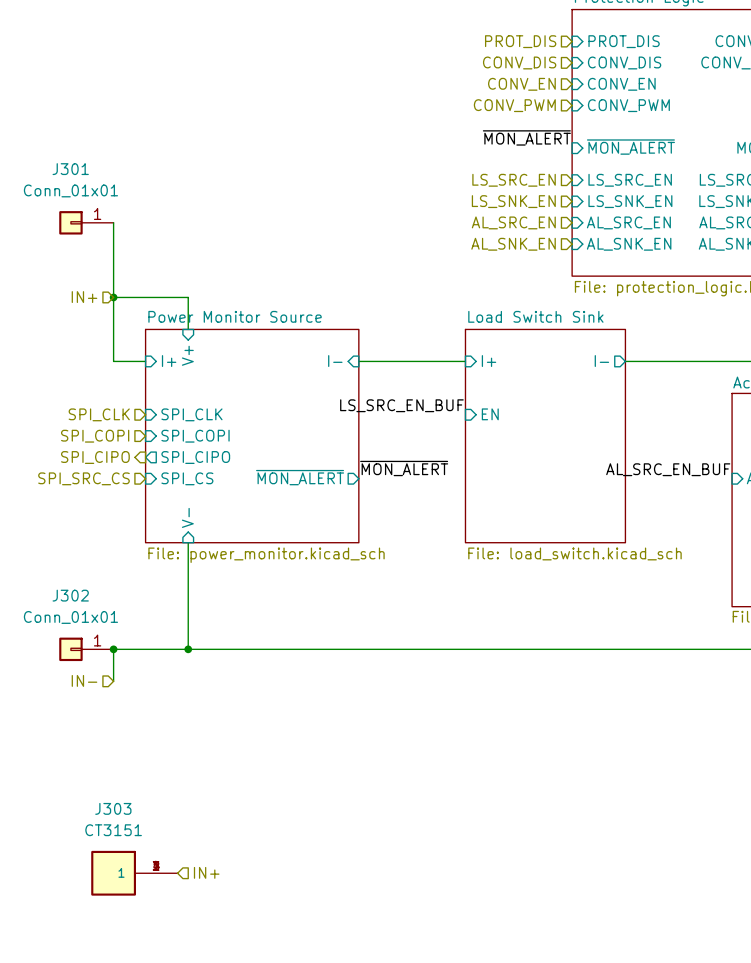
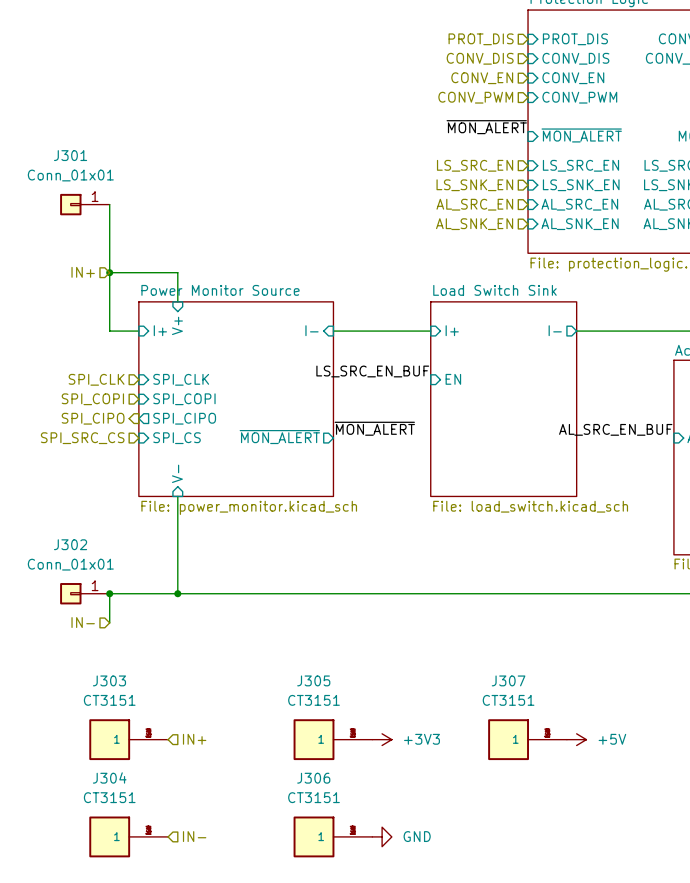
J305: none -> CT3151 (332, 739)
power symbol: none -> +3V3 (382, 739)
J307: none -> CT3151 (527, 739)
power symbol: none -> +5V (576, 739)
hierarchical label position: IN+ (206, 872) -> IN+ (194, 739)
J303 position: (134, 873) -> (128, 739)
J304: none -> CT3151 (128, 836)
hierarchical label: none -> IN- (194, 836)
J306: none -> CT3151 (332, 836)
power symbol: none -> GND (382, 836)

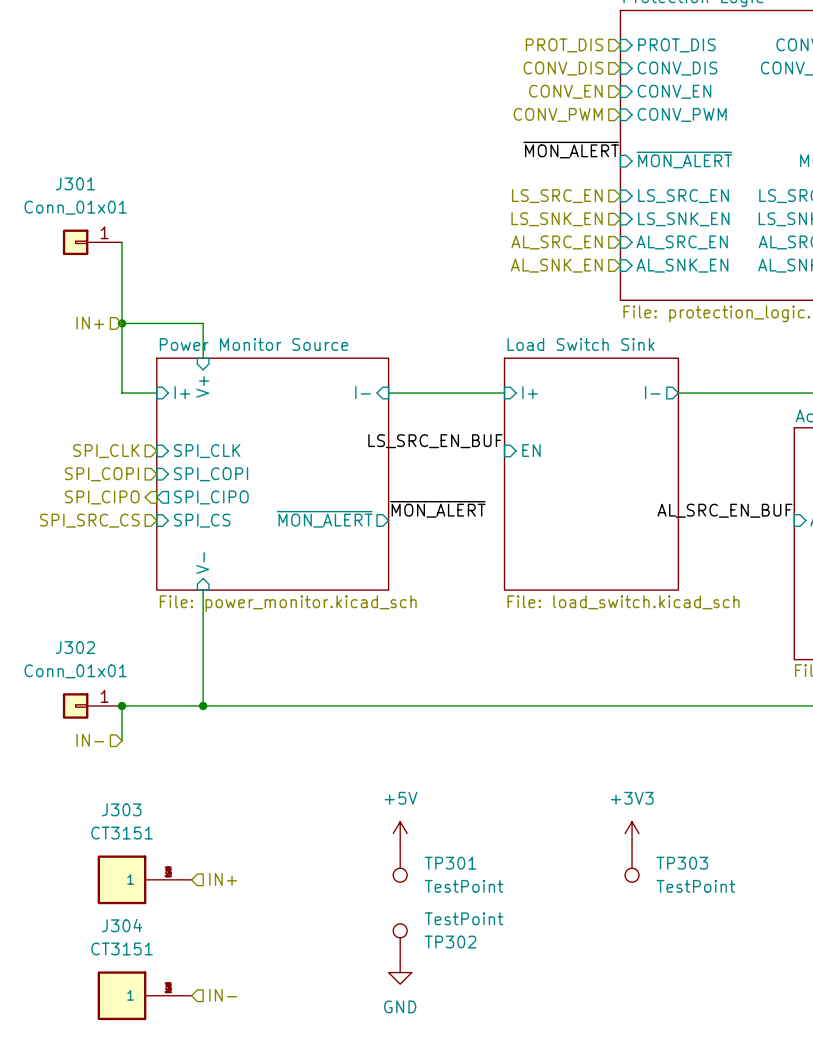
power symbol: none -> +5V (400, 833)
TP301: none -> TestPoint (400, 863)
TP303: none -> TestPoint (632, 863)
J305: CT3151 (332, 739) -> none
power symbol rotation: 0° (382, 739) -> 90° counterclockwise (632, 833)
power symbol position: +3V3 (382, 739) -> +3V3 (632, 833)
J307: CT3151 (527, 739) -> none
power symbol: +5V (576, 739) -> none
TP302: none -> TestPoint (400, 942)
J306: CT3151 (332, 836) -> none
power symbol rotation: 0° (382, 836) -> 90° clockwise (400, 972)
power symbol position: GND (382, 836) -> GND (400, 972)

